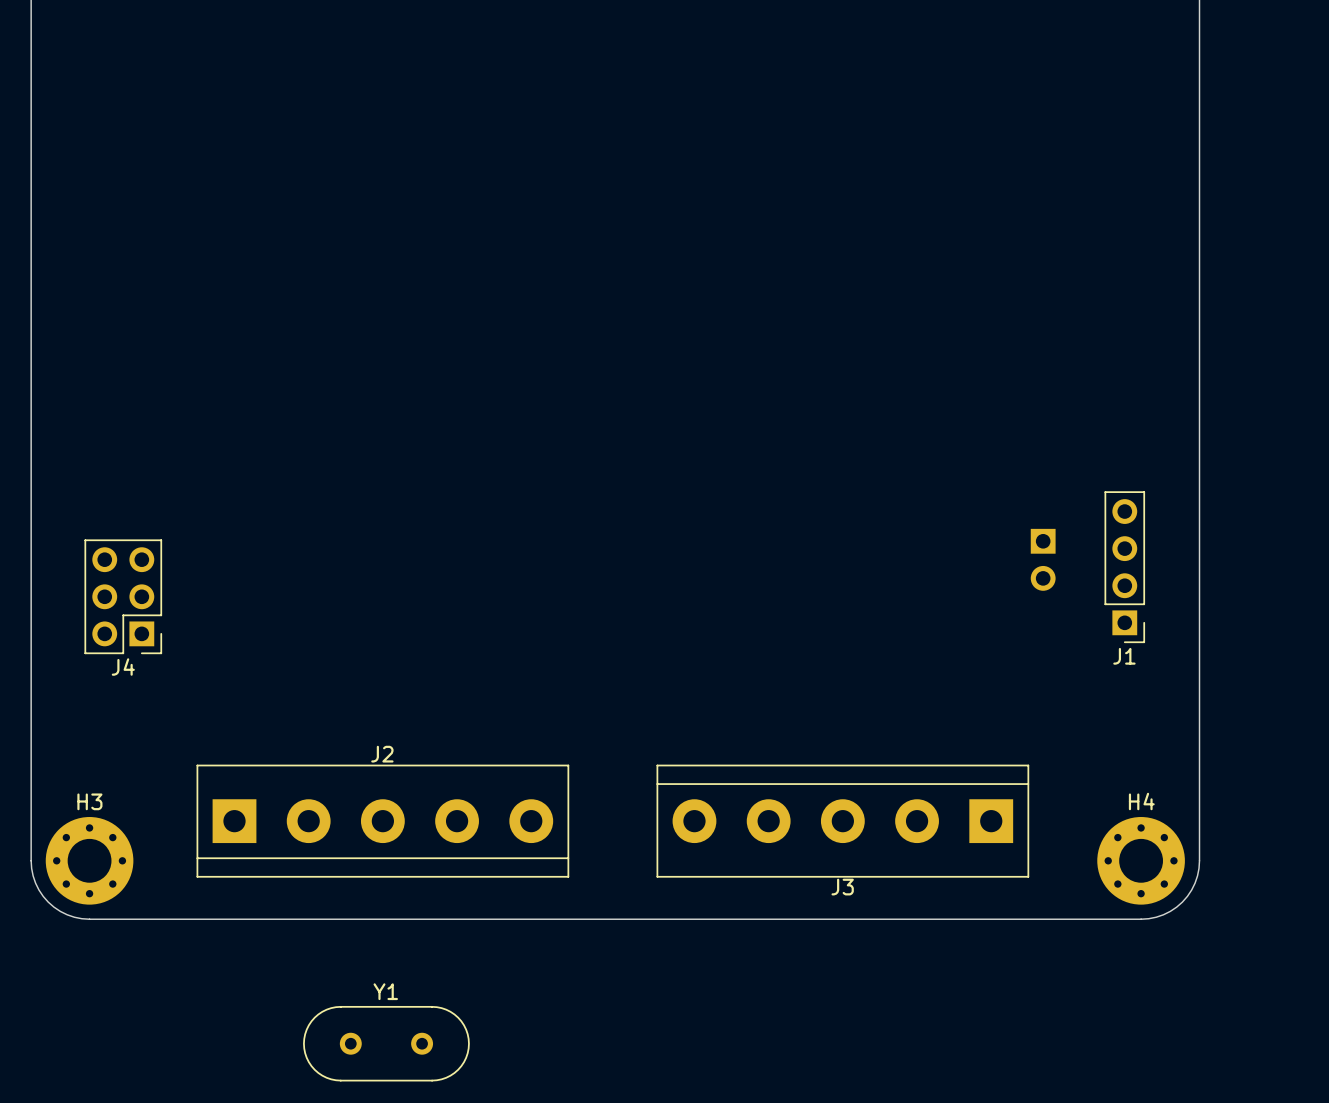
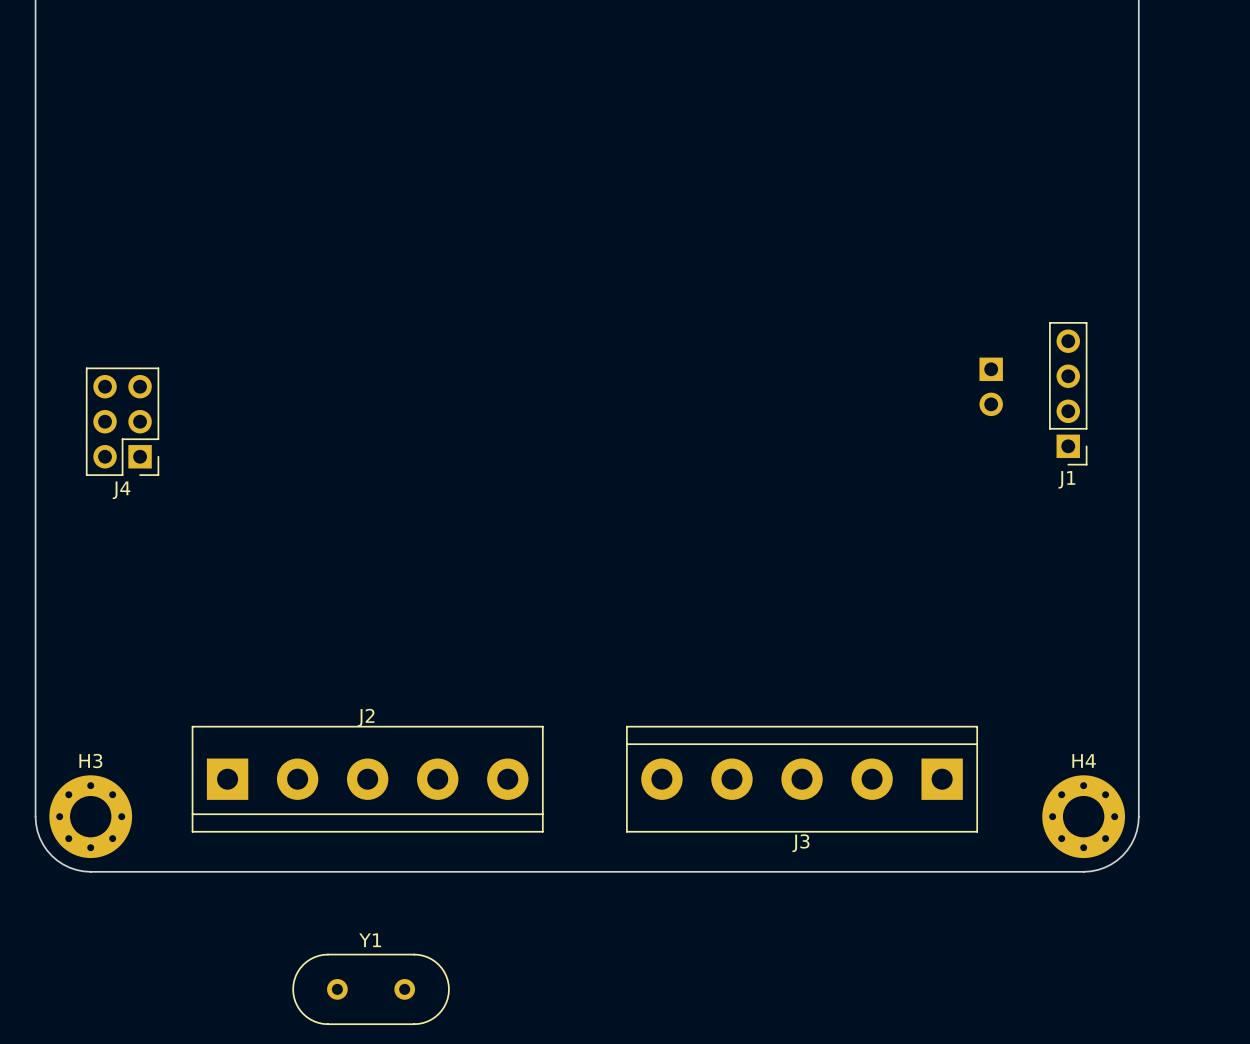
part position: (1043, 559) -> (991, 386)
J1 position: (1124, 567) -> (1068, 393)
J4 position: (123, 596) -> (122, 421)

